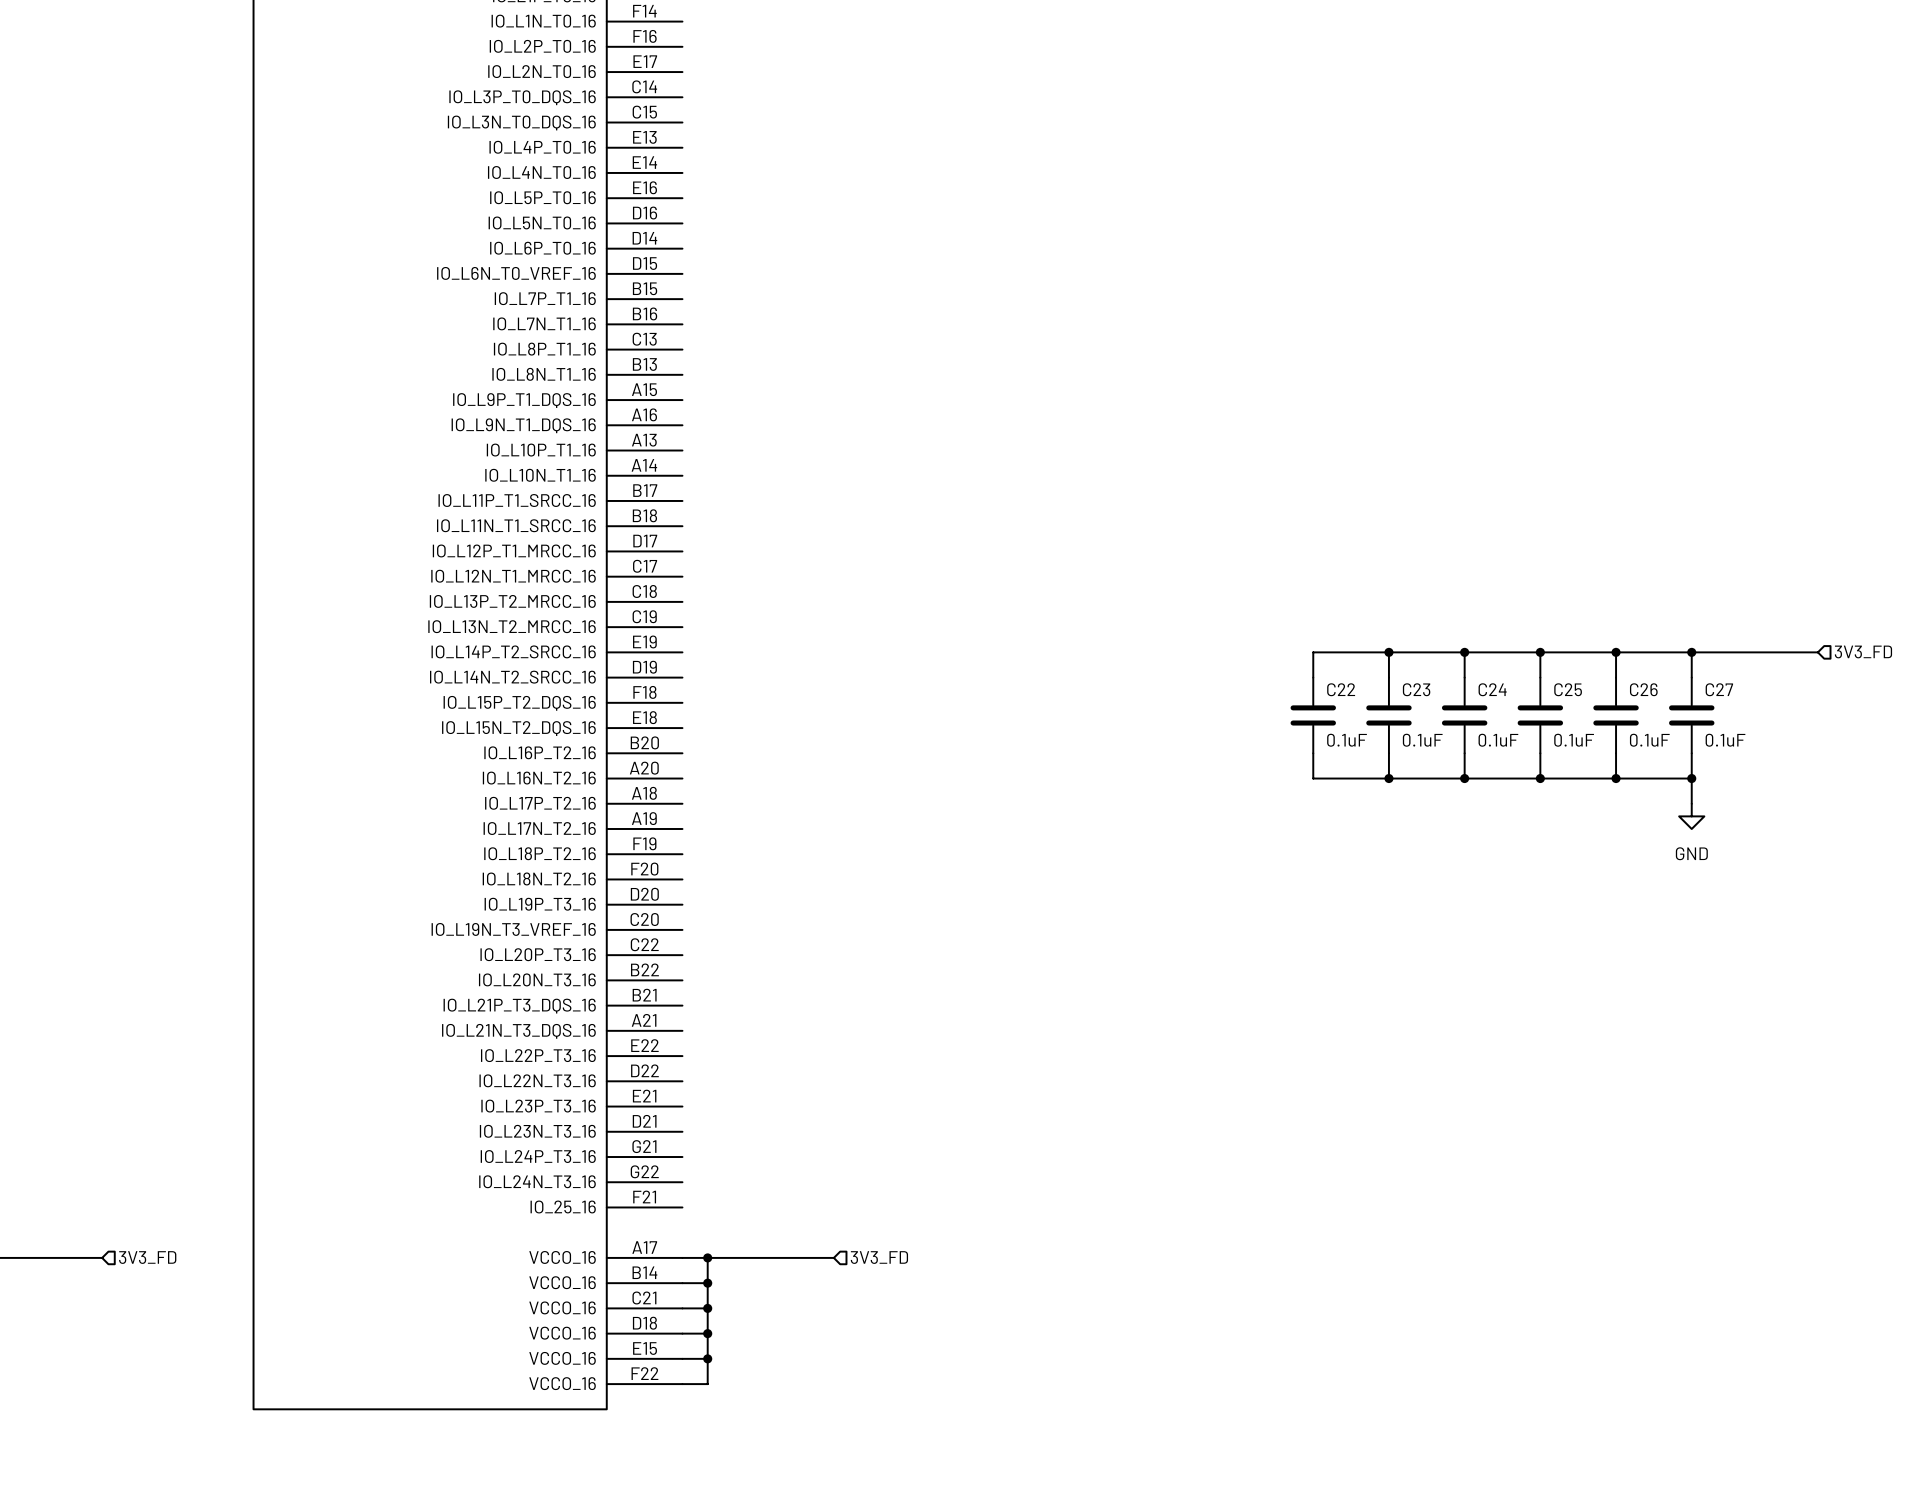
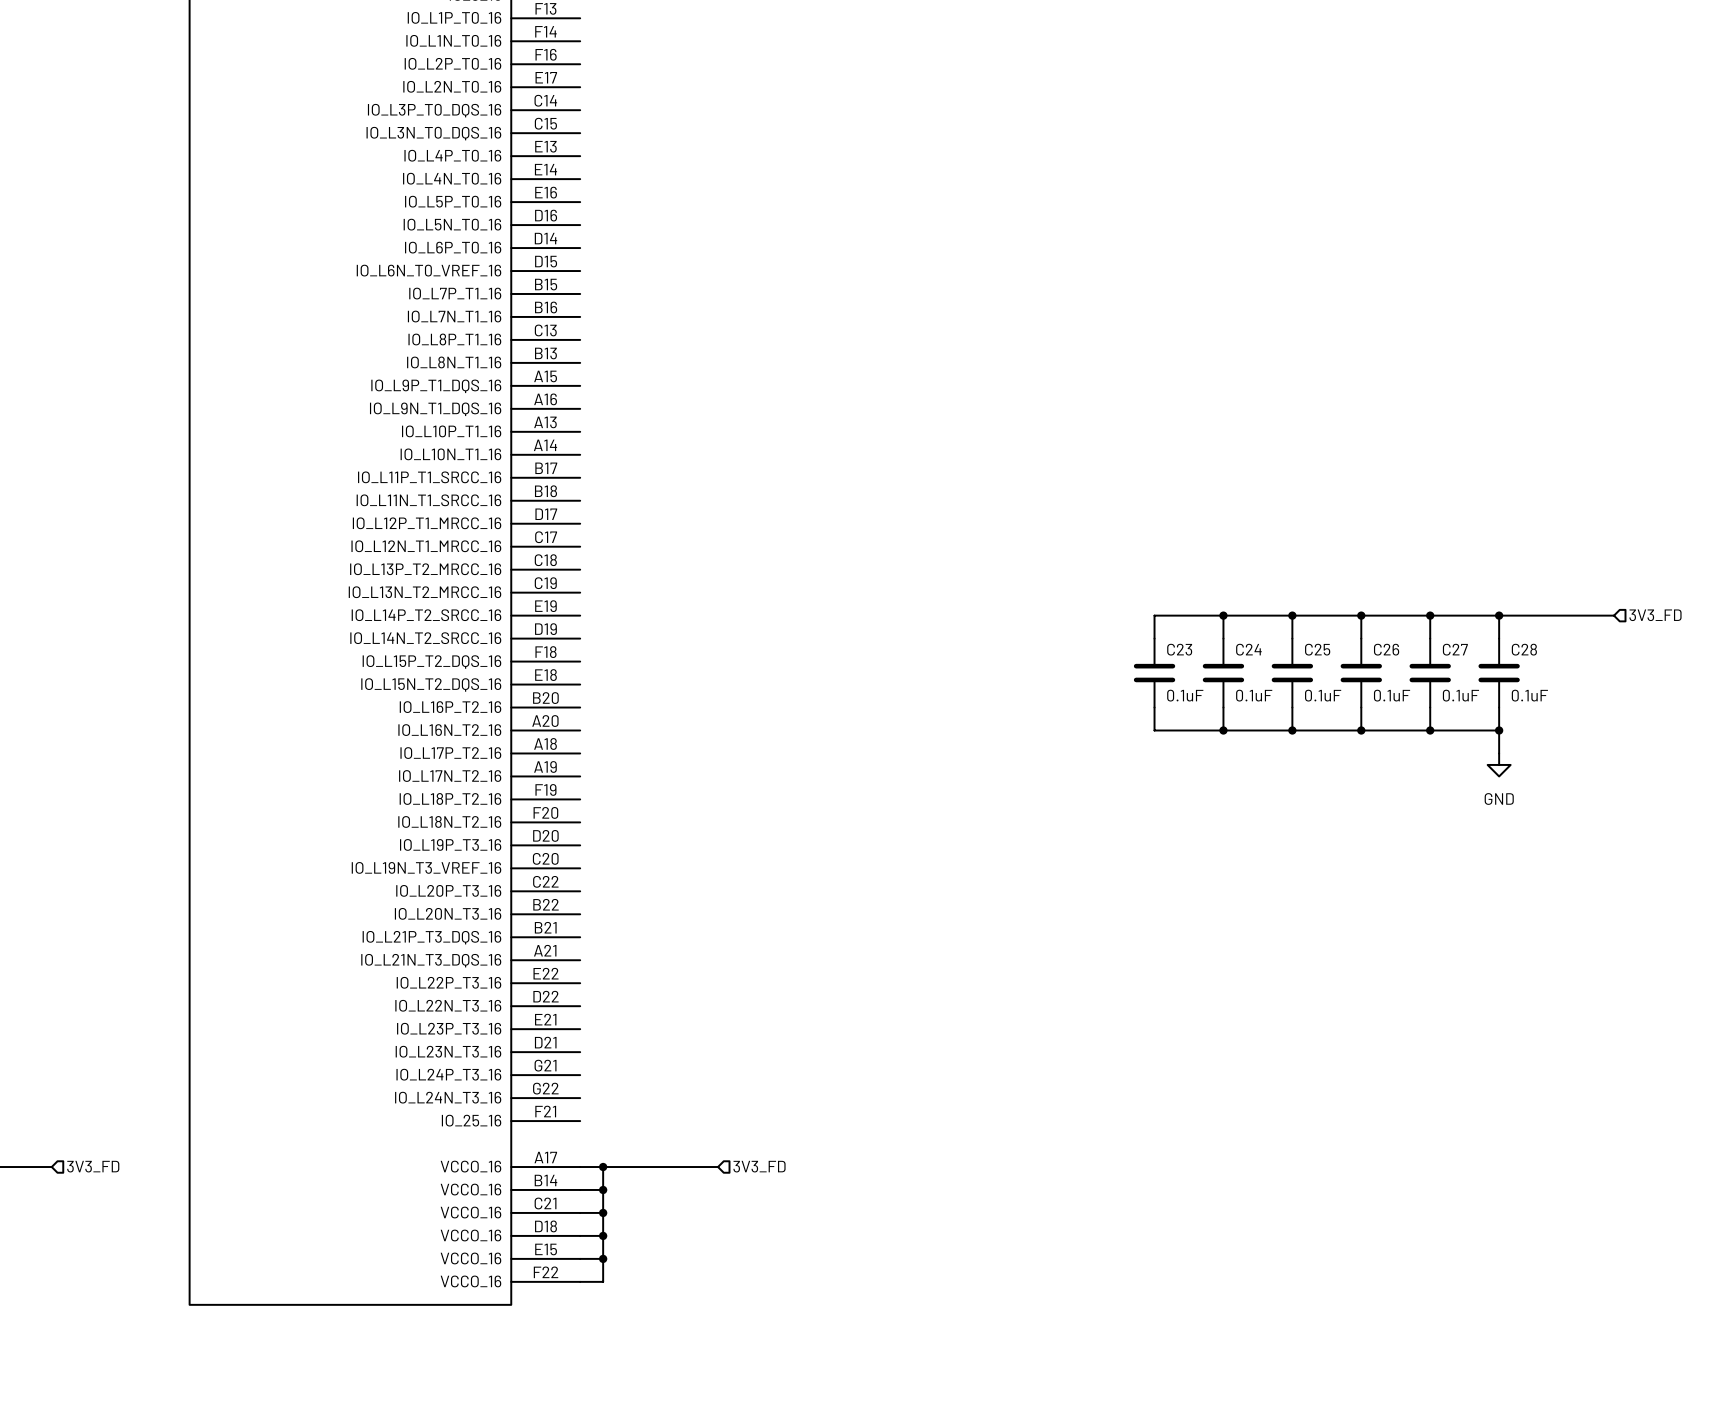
C22 name: C22 (1341, 689) -> C23 (1179, 649)
C23 name: C23 (1416, 689) -> C24 (1248, 649)
C24 name: C24 (1492, 689) -> C25 (1317, 649)
C25 name: C25 (1568, 689) -> C26 (1386, 649)
C26 name: C26 (1643, 689) -> C27 (1455, 649)
C27 name: C27 (1719, 689) -> C28 (1524, 649)

